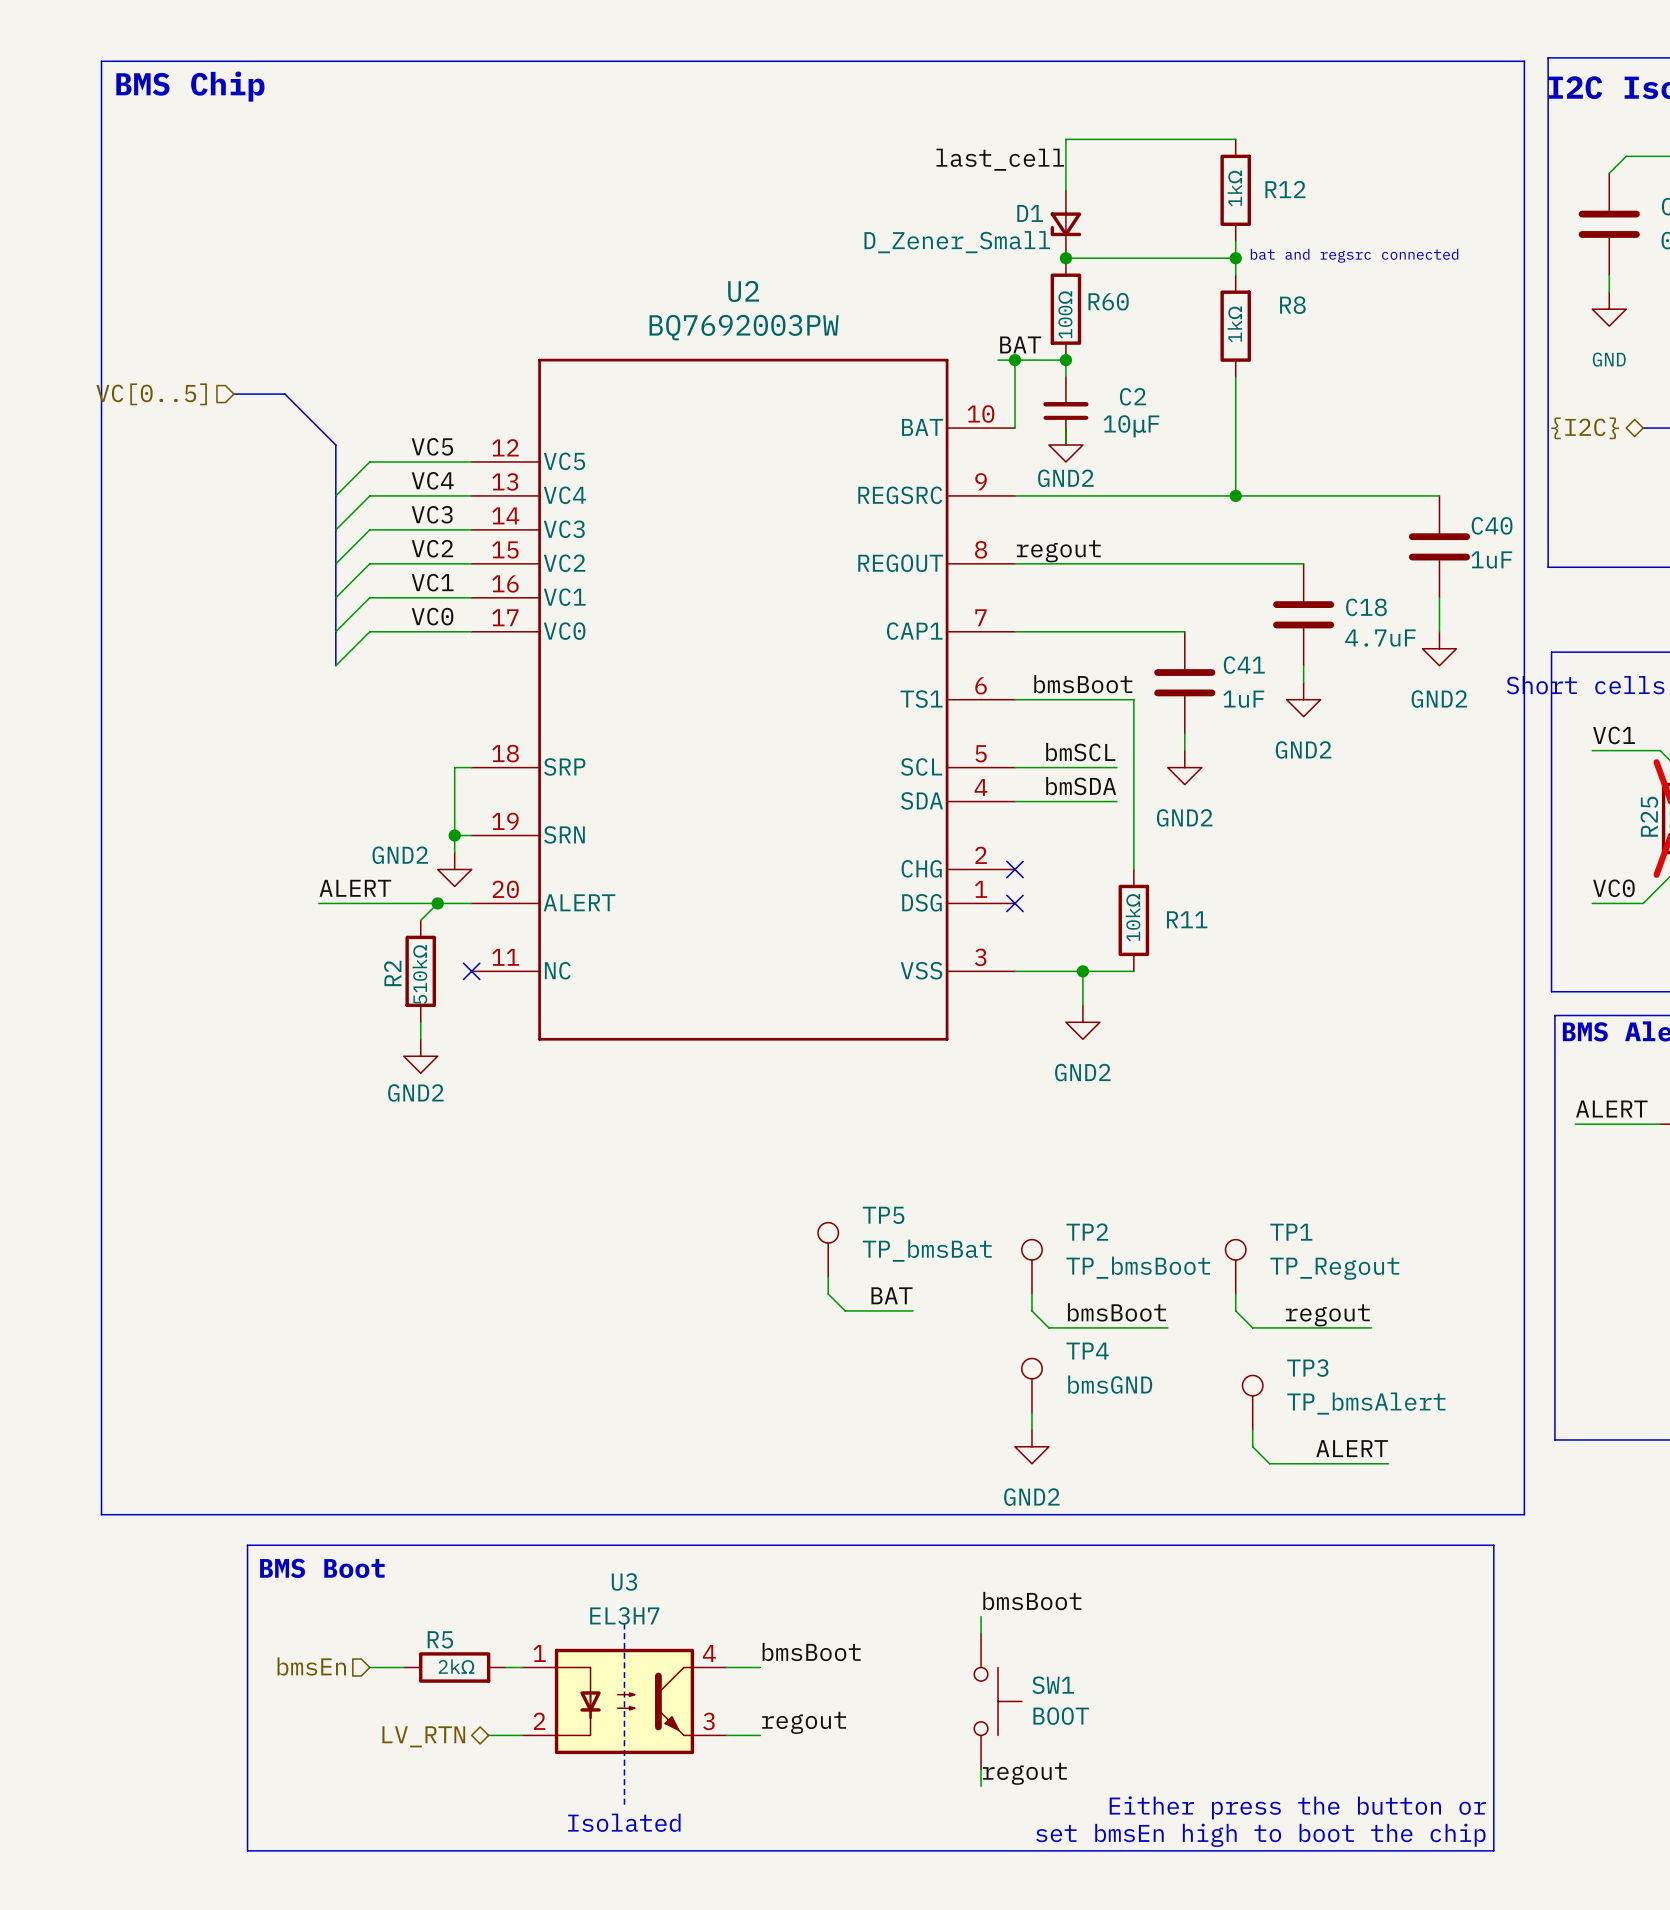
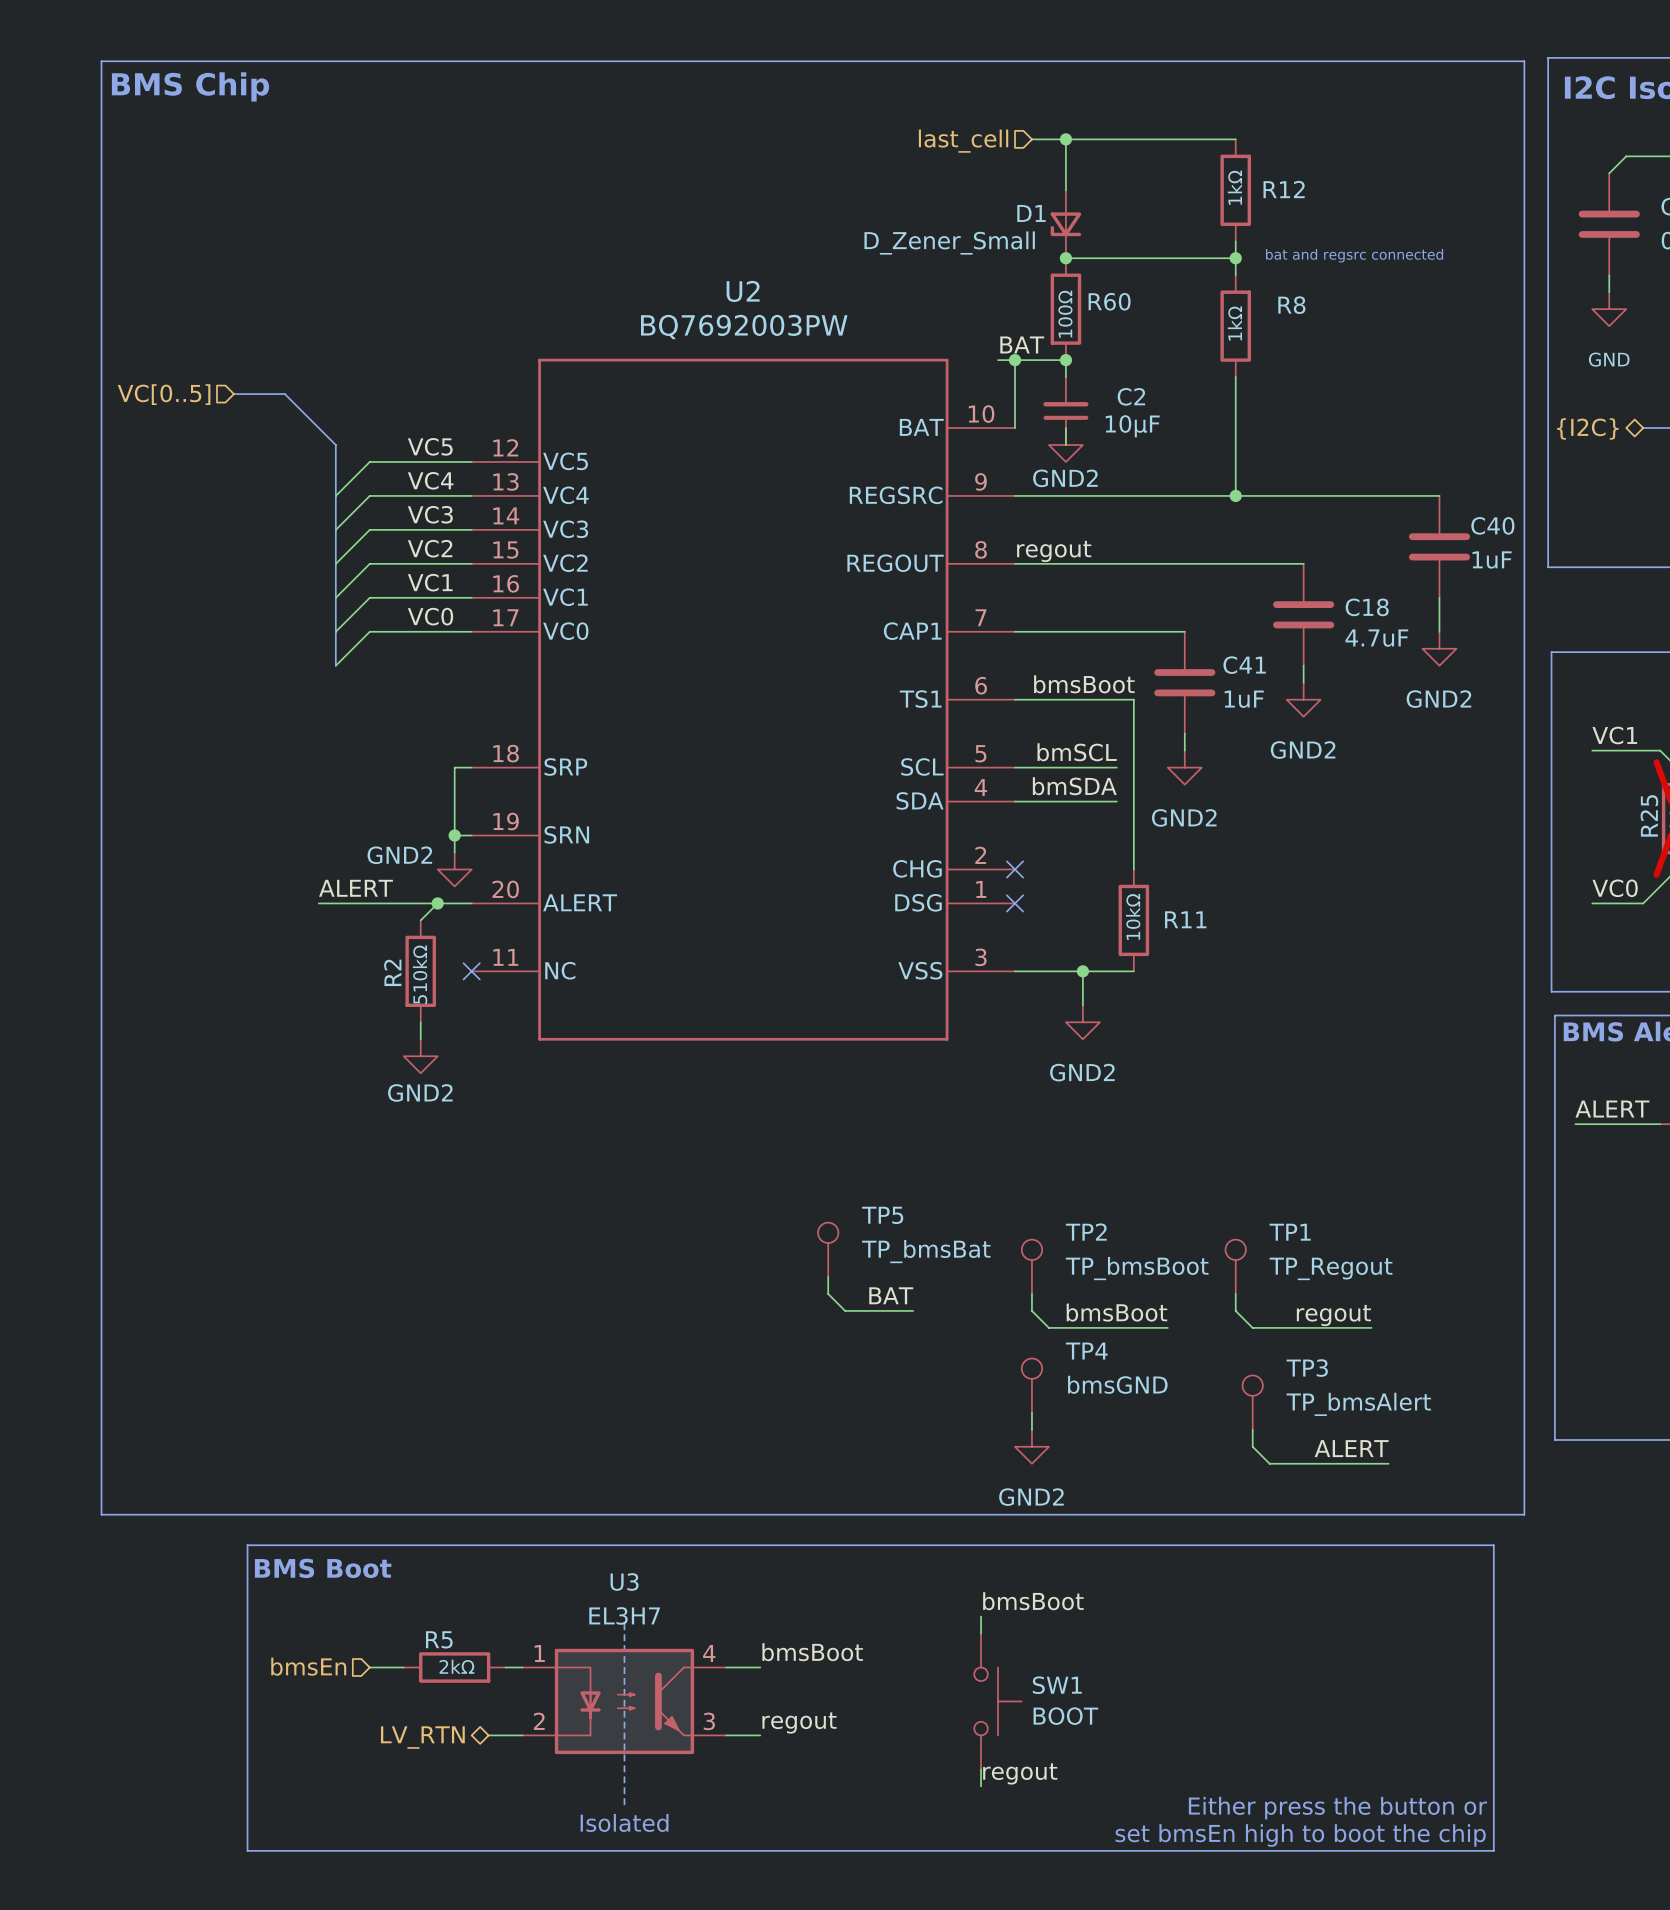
wire: none -> (1031, 139) (1065, 139)
junction: none -> (1065, 139)
hierarchical label: none -> last_cell (963, 141)
label: last_cell (1000, 159) -> none

